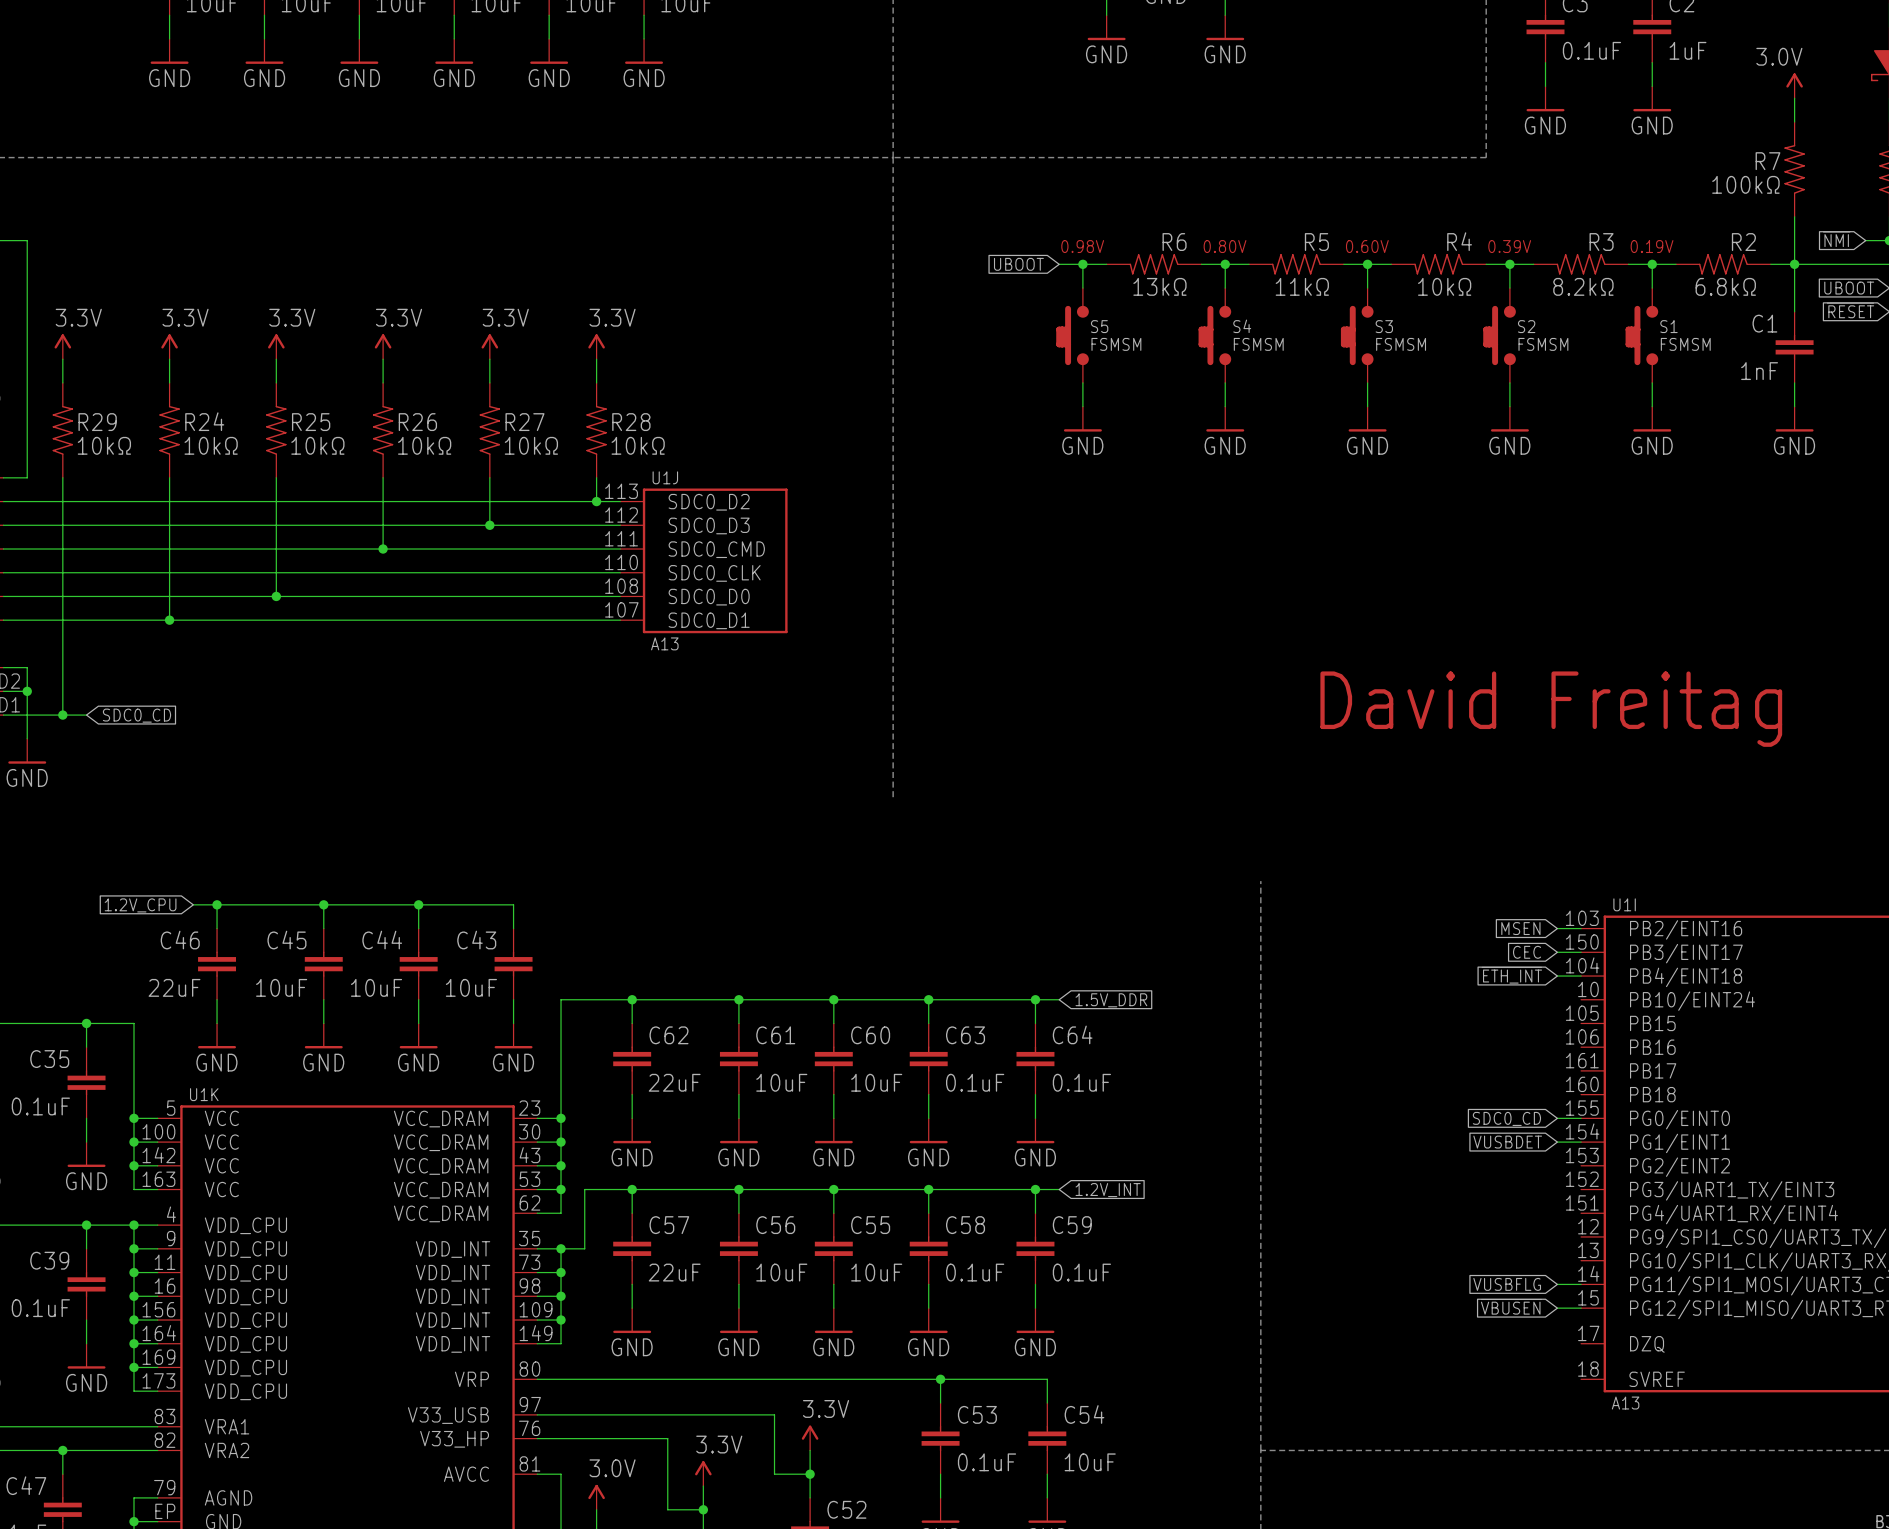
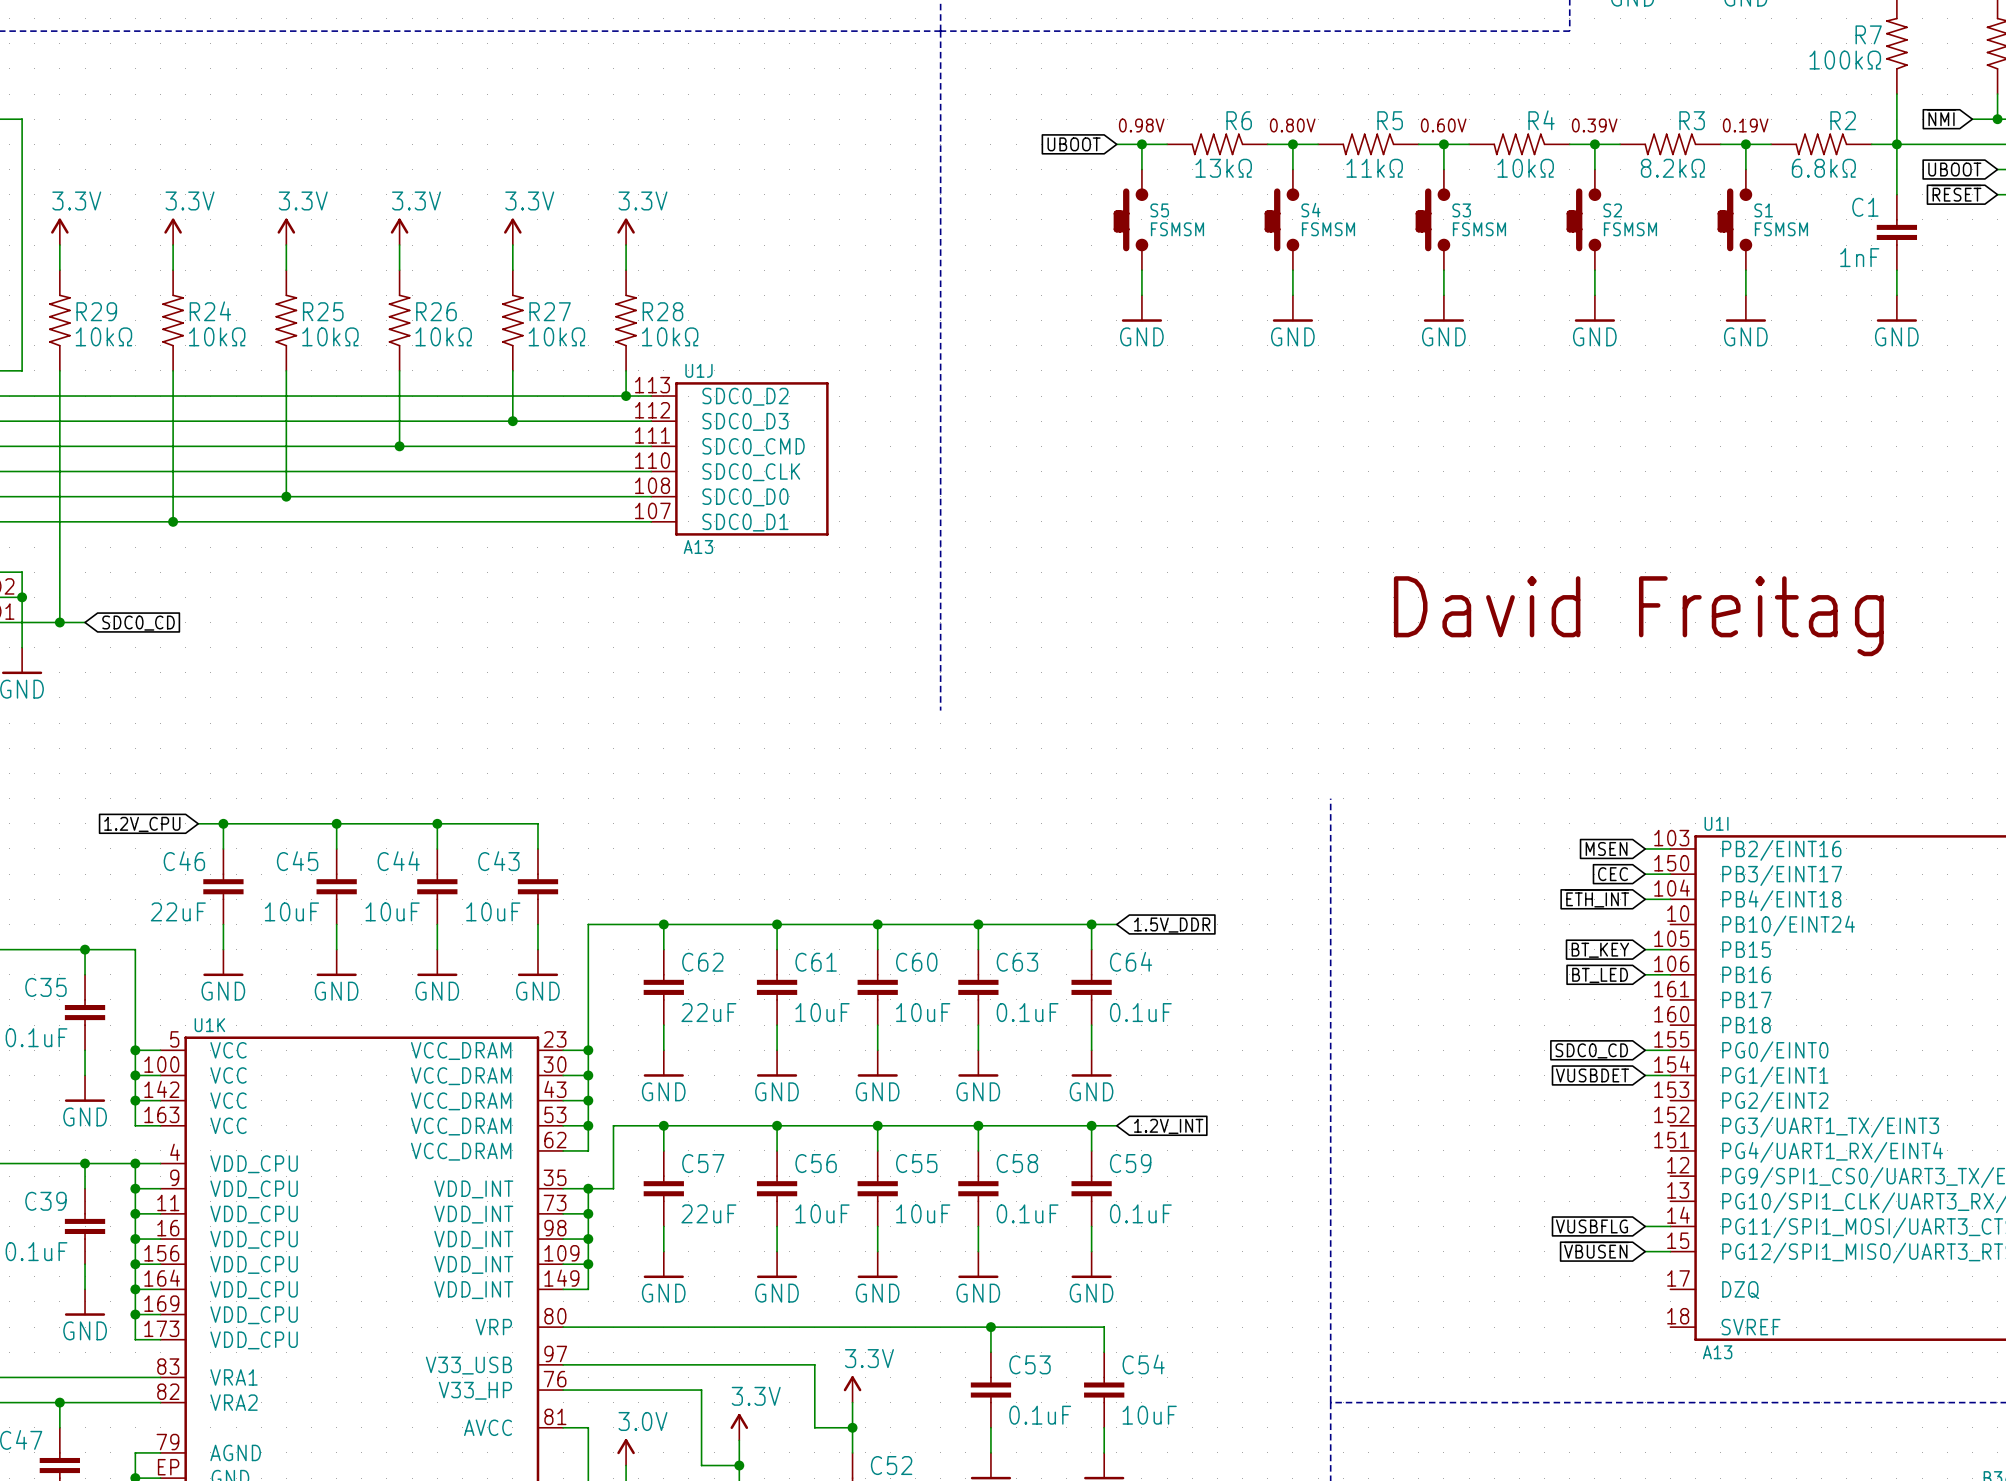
wire: none -> (1645, 949) (1670, 949)
global label: none -> BT_KEY (1600, 950)
global label: none -> BT_LED (1600, 975)
wire: none -> (1645, 974) (1670, 974)

